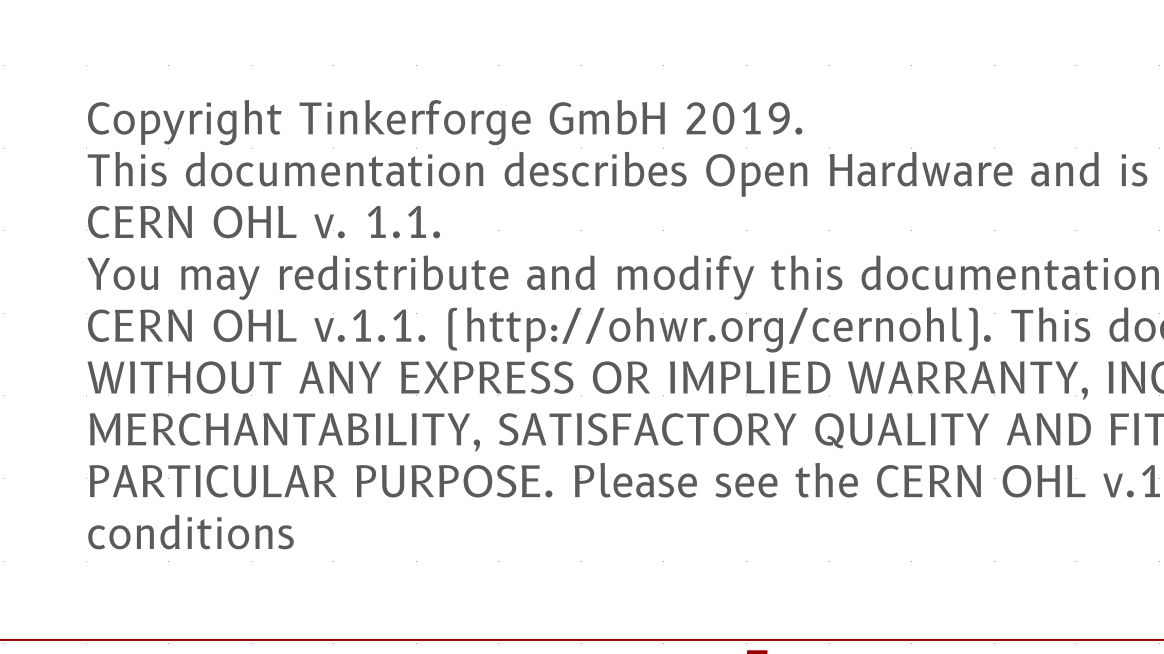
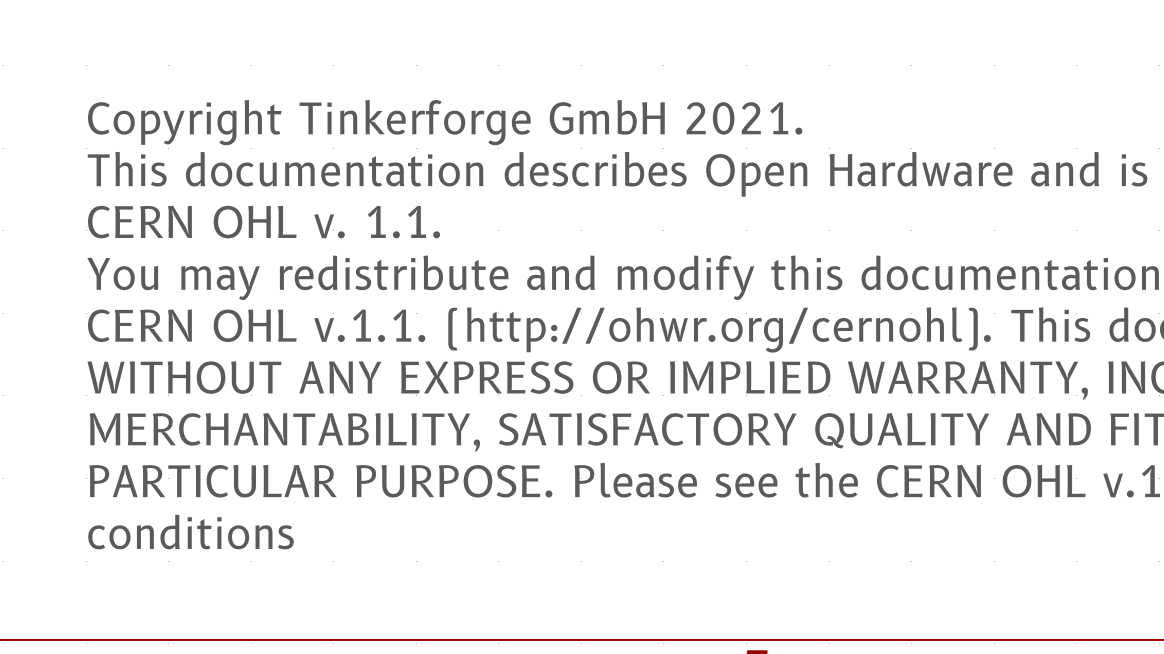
text: Copyright Tinkerforge GmbH 2019. (445, 122) -> Copyright Tinkerforge GmbH 2021. (445, 122)

